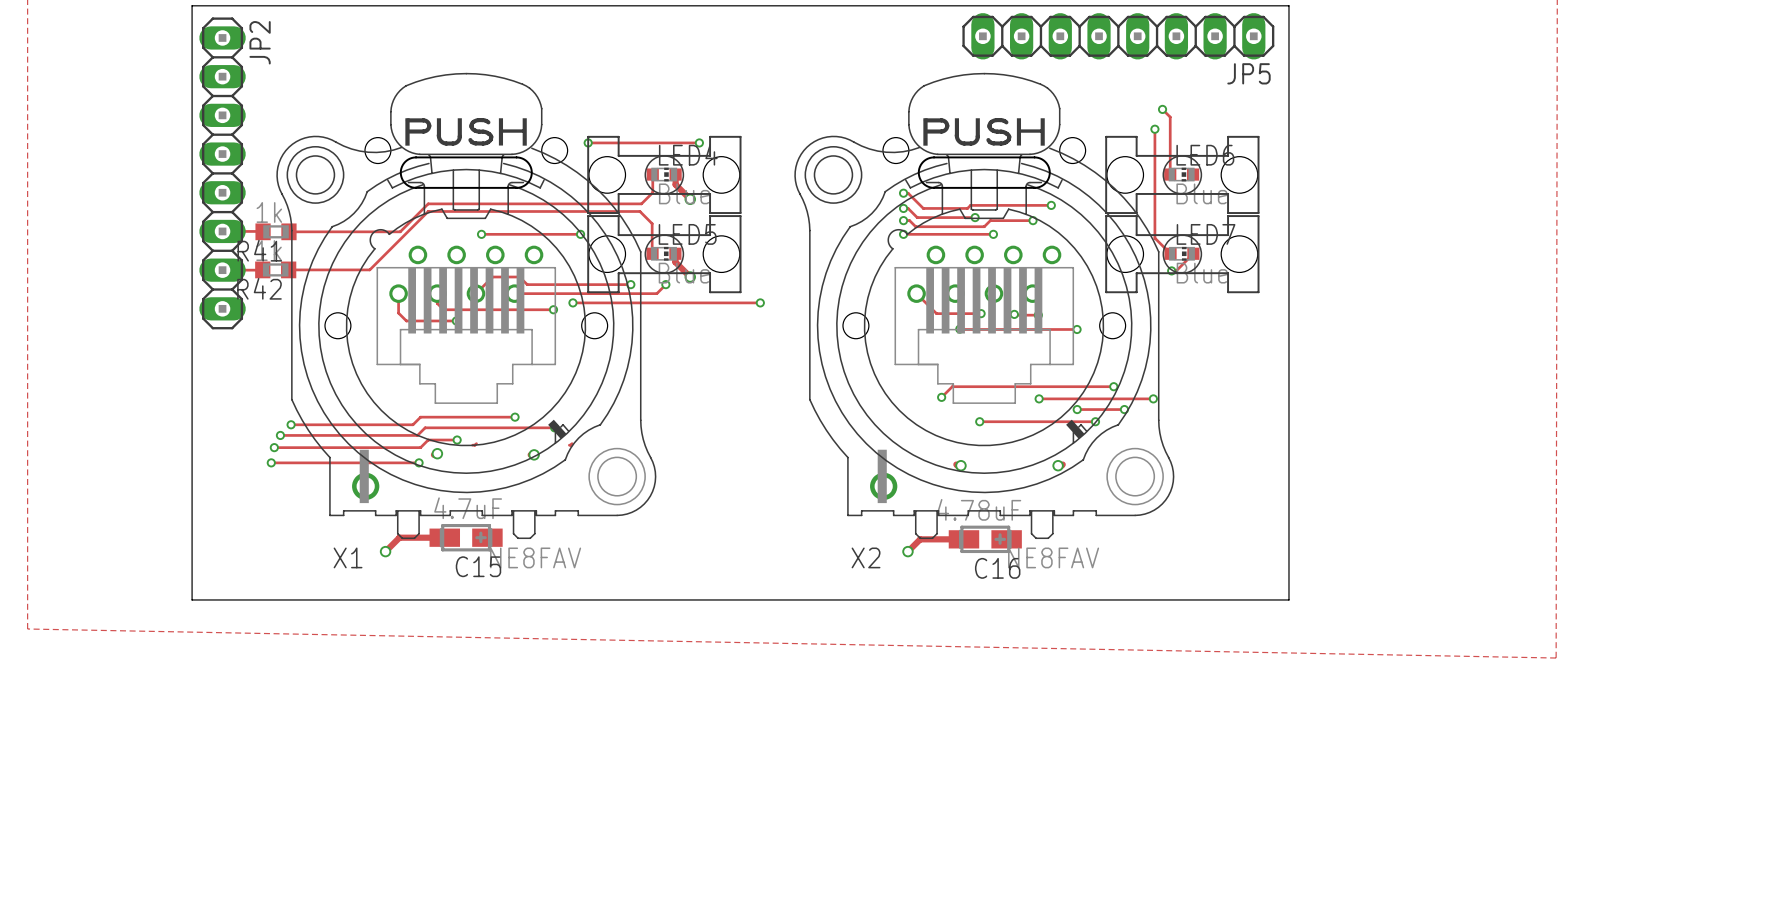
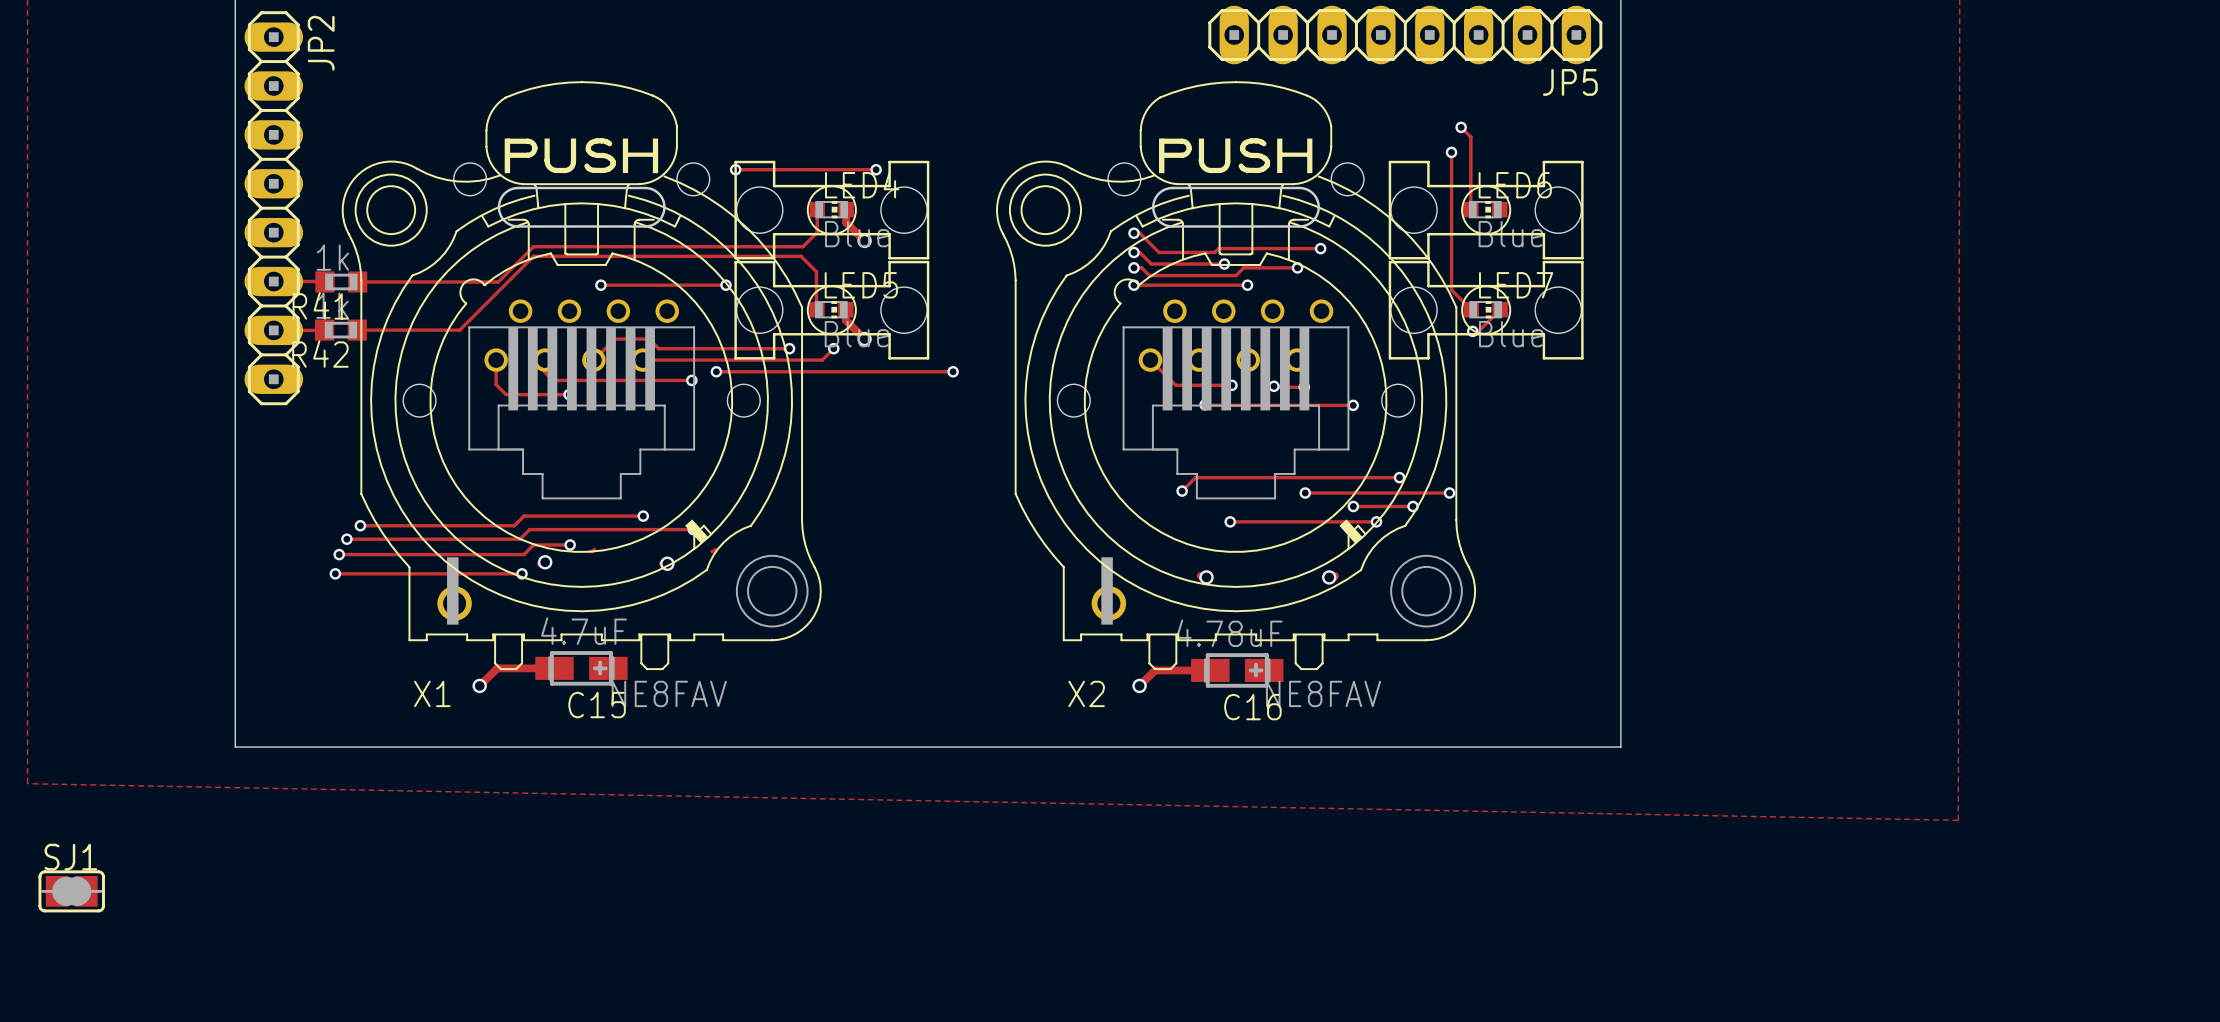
SJ1: none -> (71, 891)

